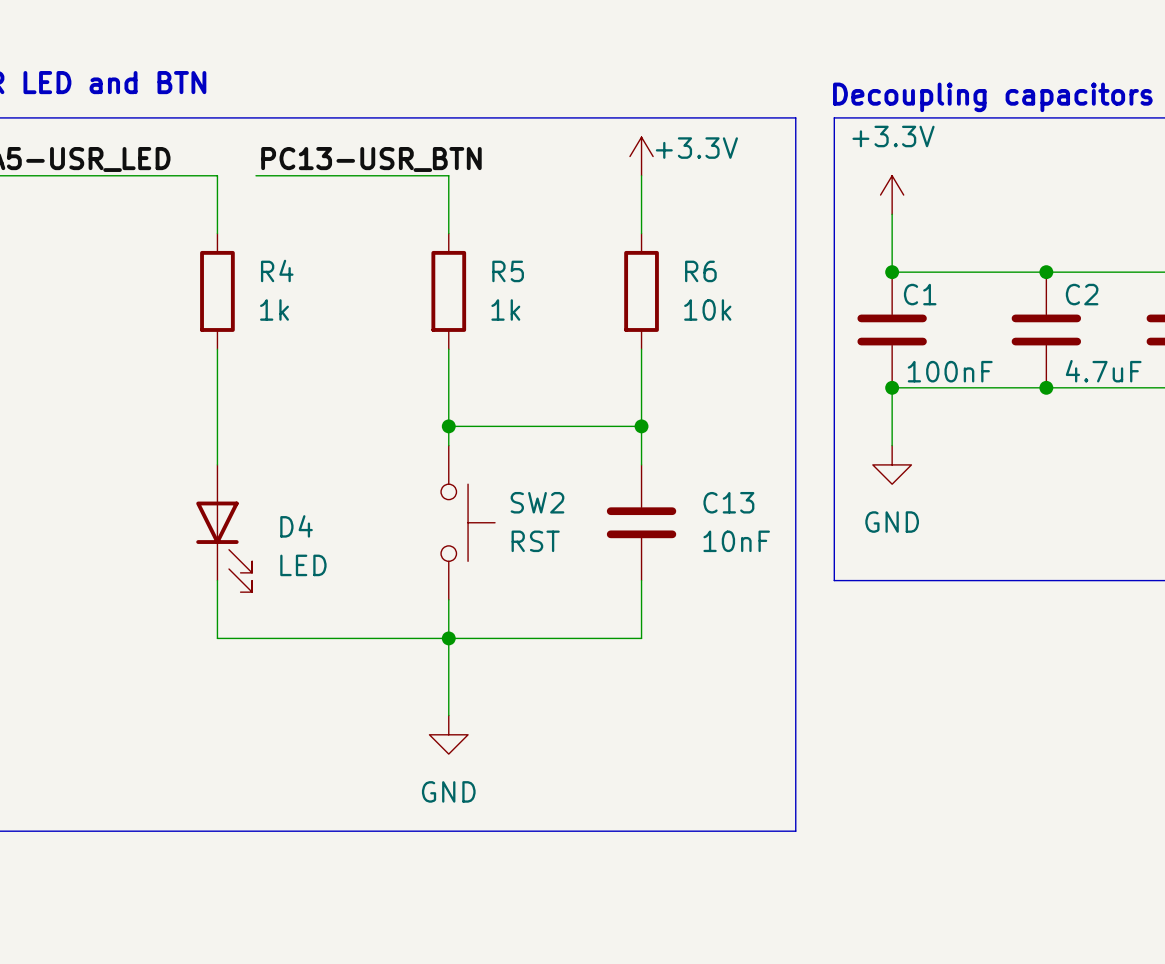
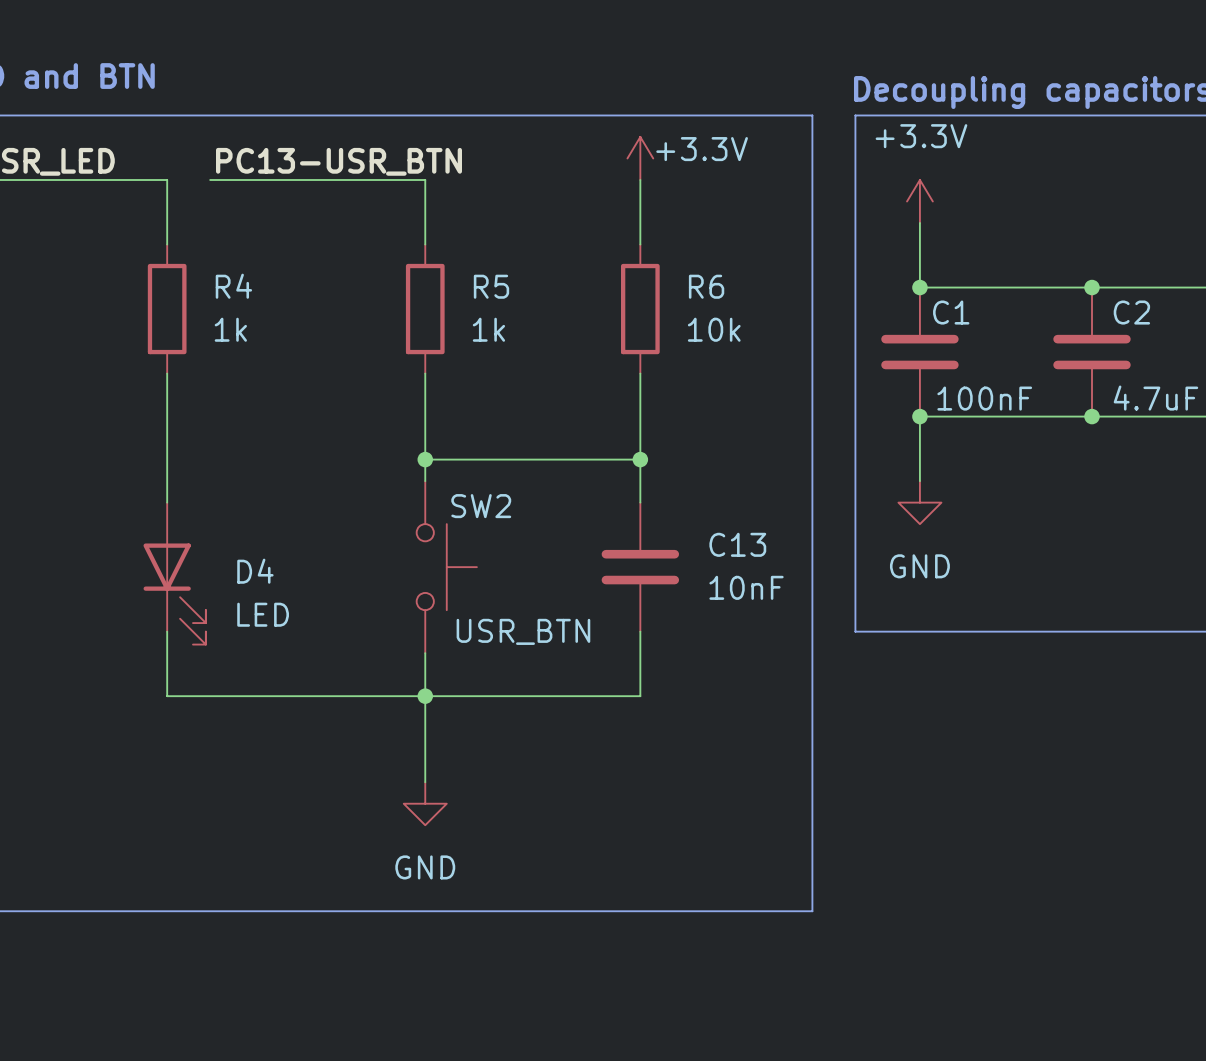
SW2 name position: SW2 (537, 502) -> SW2 (481, 506)
SW2 value: RST (535, 541) -> USR_BTN (523, 631)

